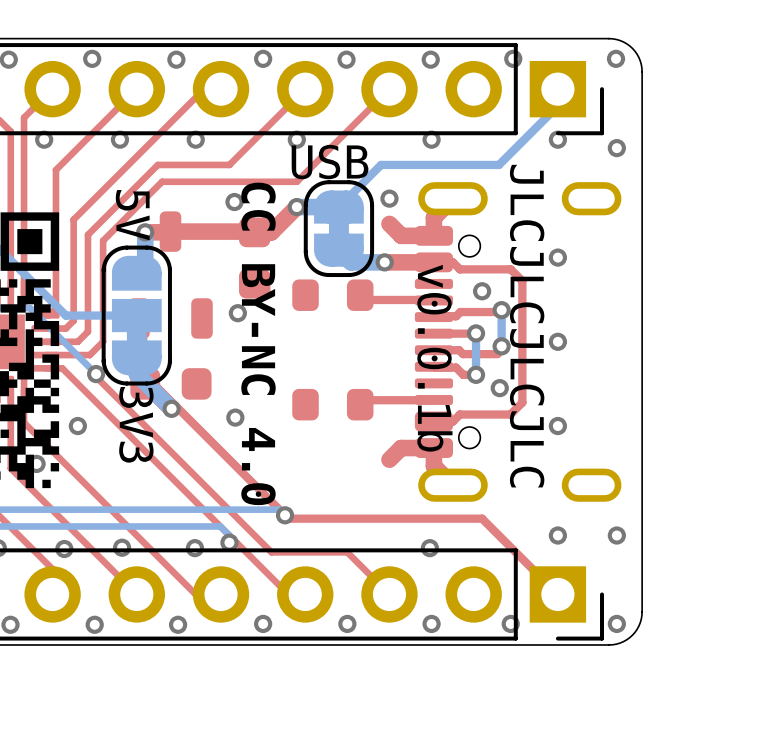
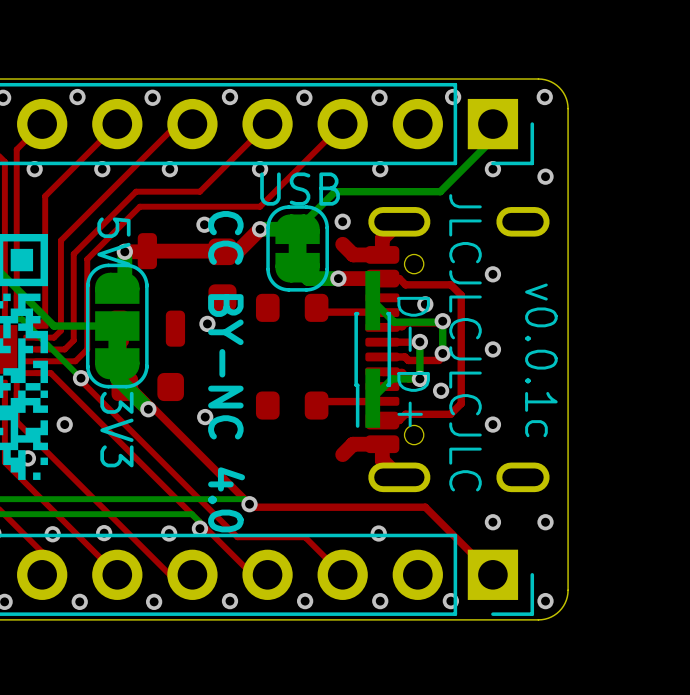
bottom track: none -> (372, 300) (394, 322) (442, 321)
text: none -> D- (413, 324)
part: none -> (372, 349)
text: none -> v0.0.1c (541, 360)
text: v0.0.1b (434, 358) -> none
bottom track: none -> (419, 378) (392, 378) (372, 398)
text: none -> D+ (413, 399)

